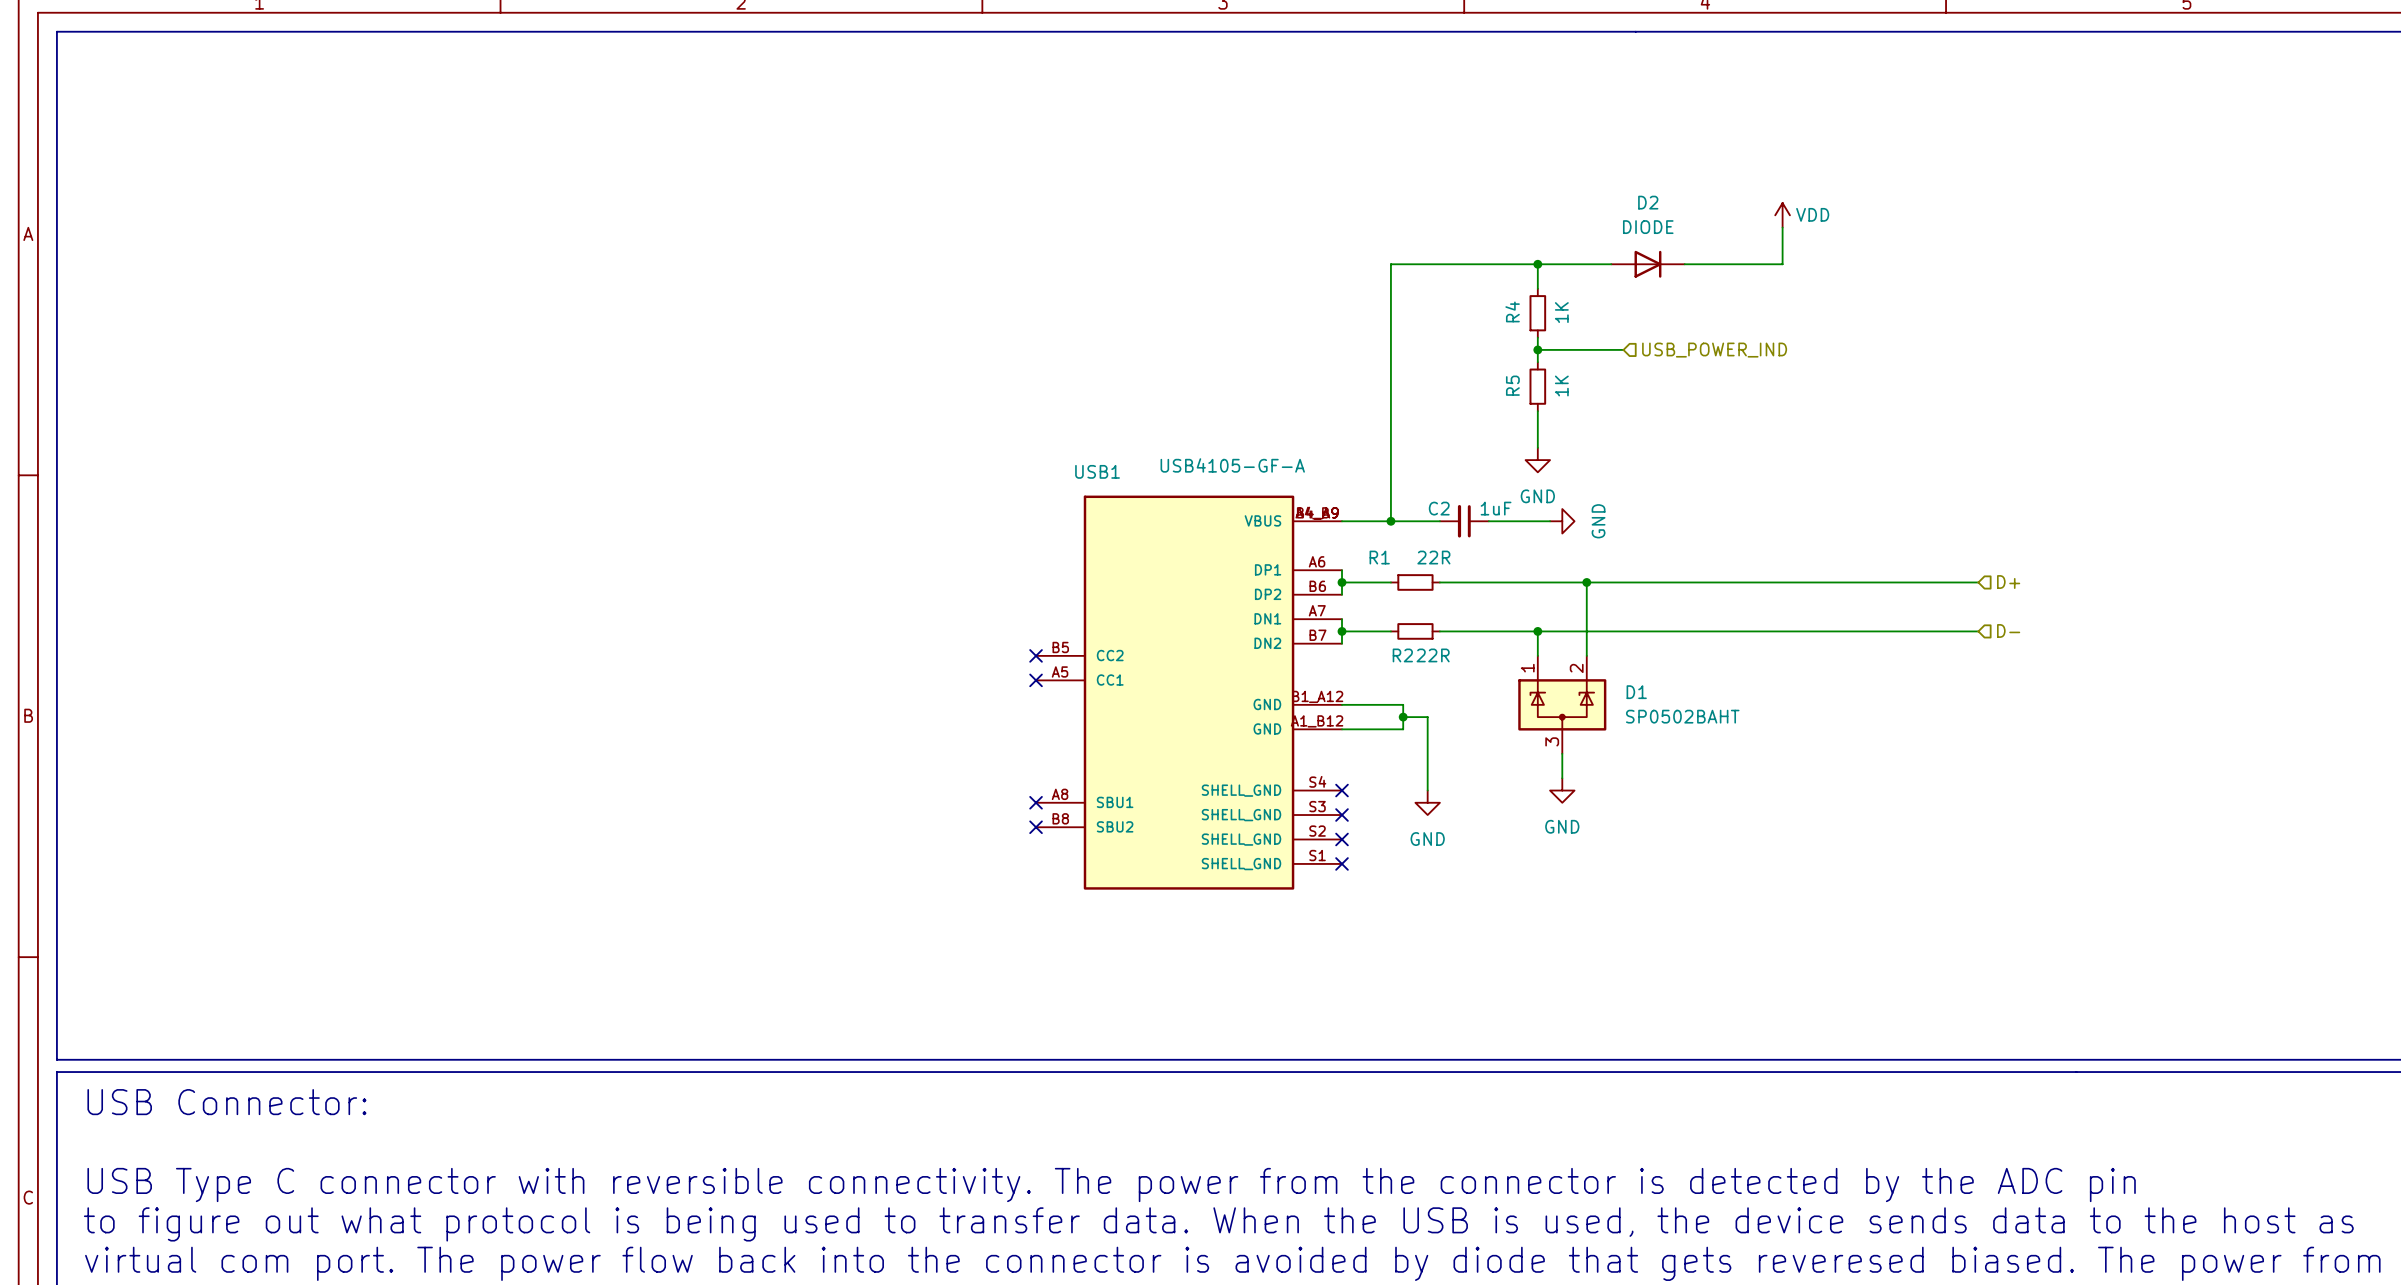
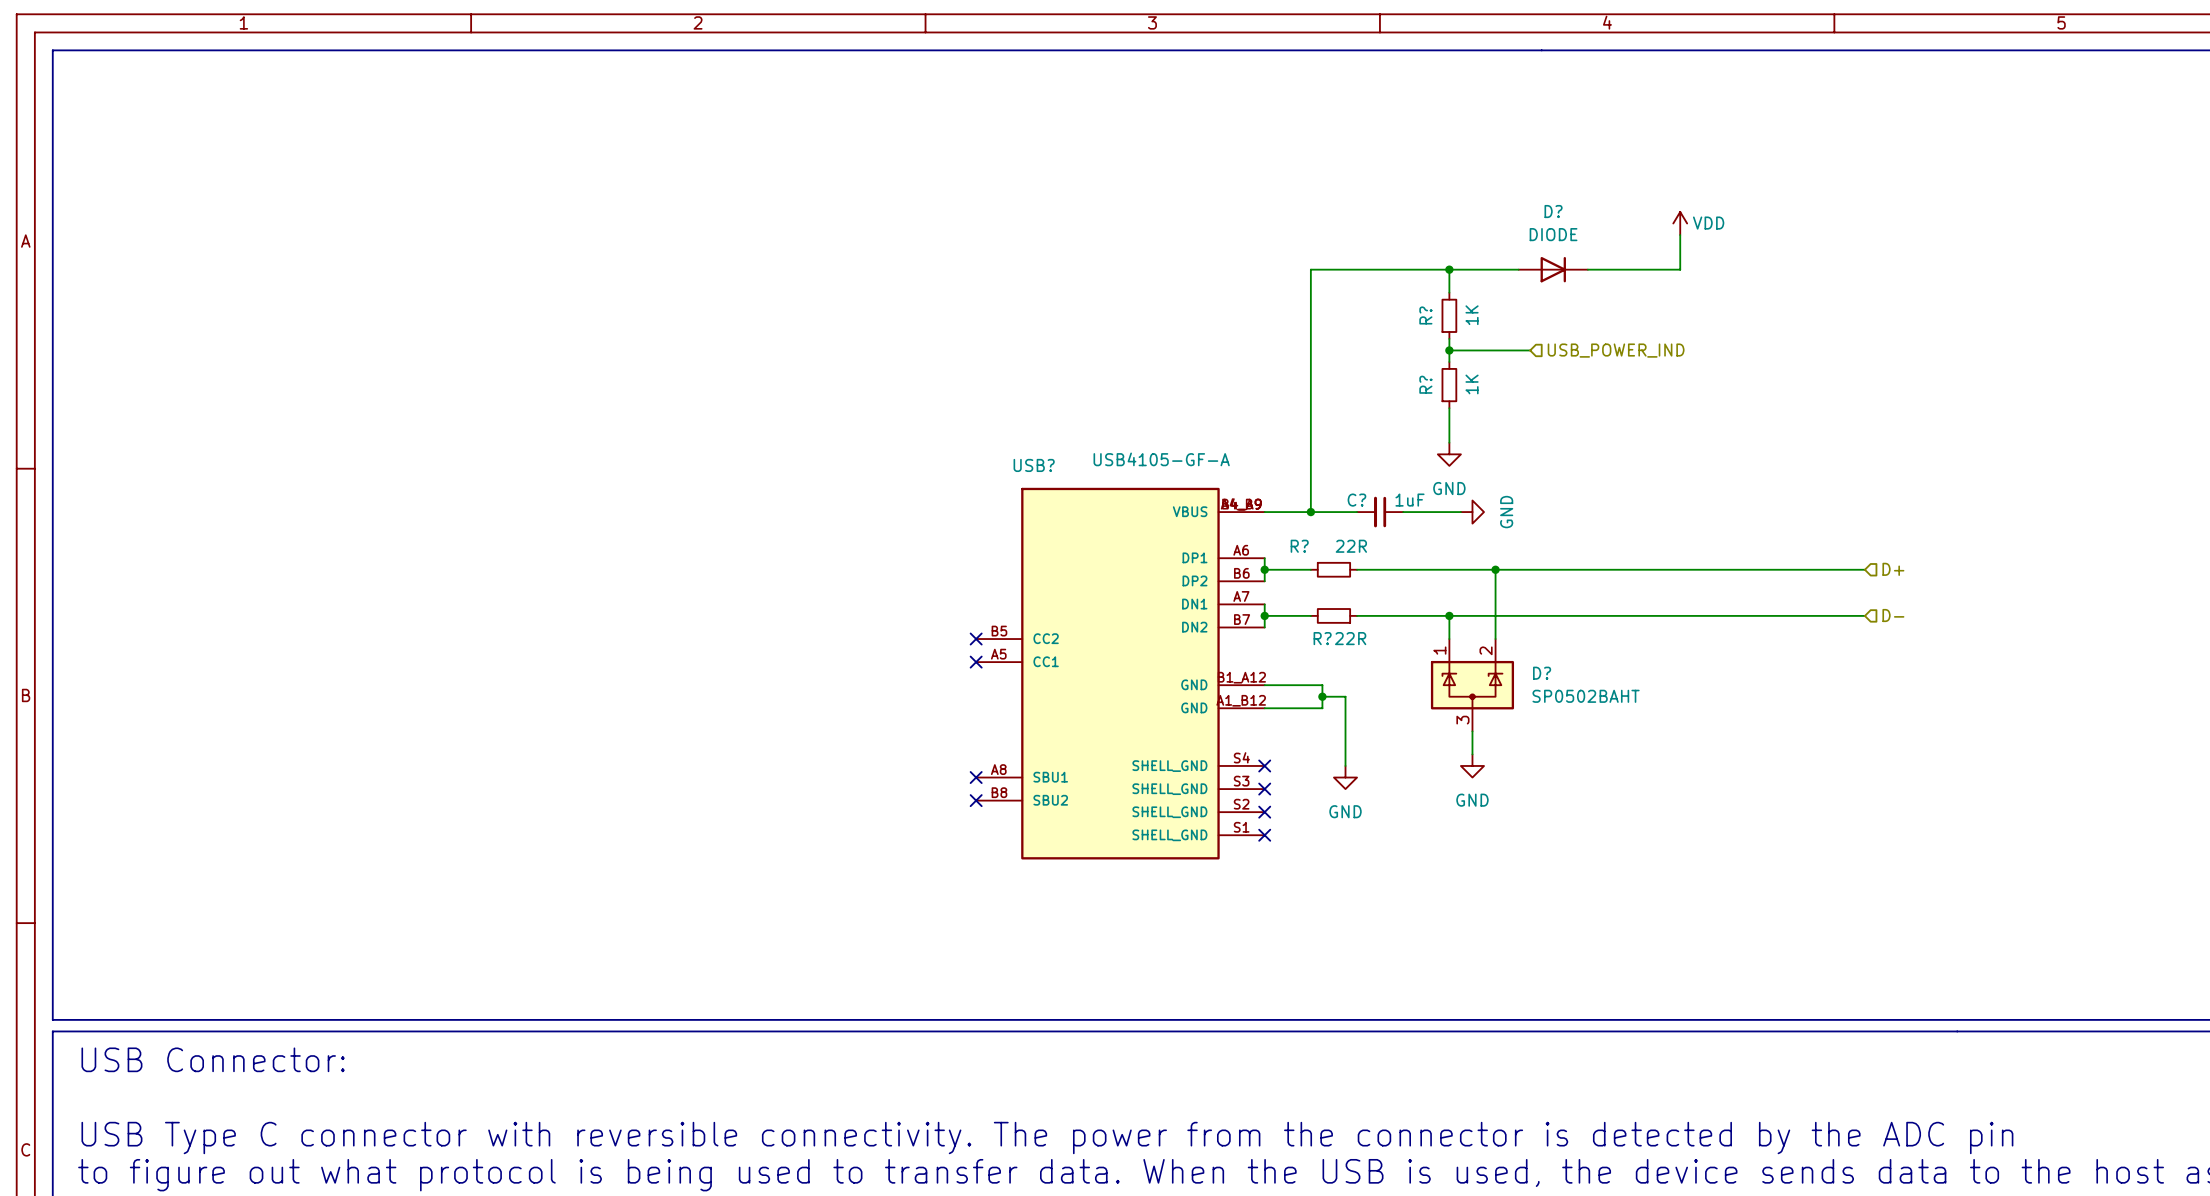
D2 name: D2 (1648, 202) -> D? (1553, 211)
R4 name: R4 (1512, 311) -> R? (1425, 315)
R5 name: R5 (1512, 385) -> R? (1425, 384)
USB1 name: USB1 (1097, 471) -> USB? (1034, 465)
C2 name: C2 (1439, 508) -> C? (1356, 500)
R1 name: R1 (1379, 557) -> R? (1299, 546)
R2 name: R2 (1402, 655) -> R? (1322, 638)
D1 name: D1 (1636, 692) -> D? (1542, 673)

